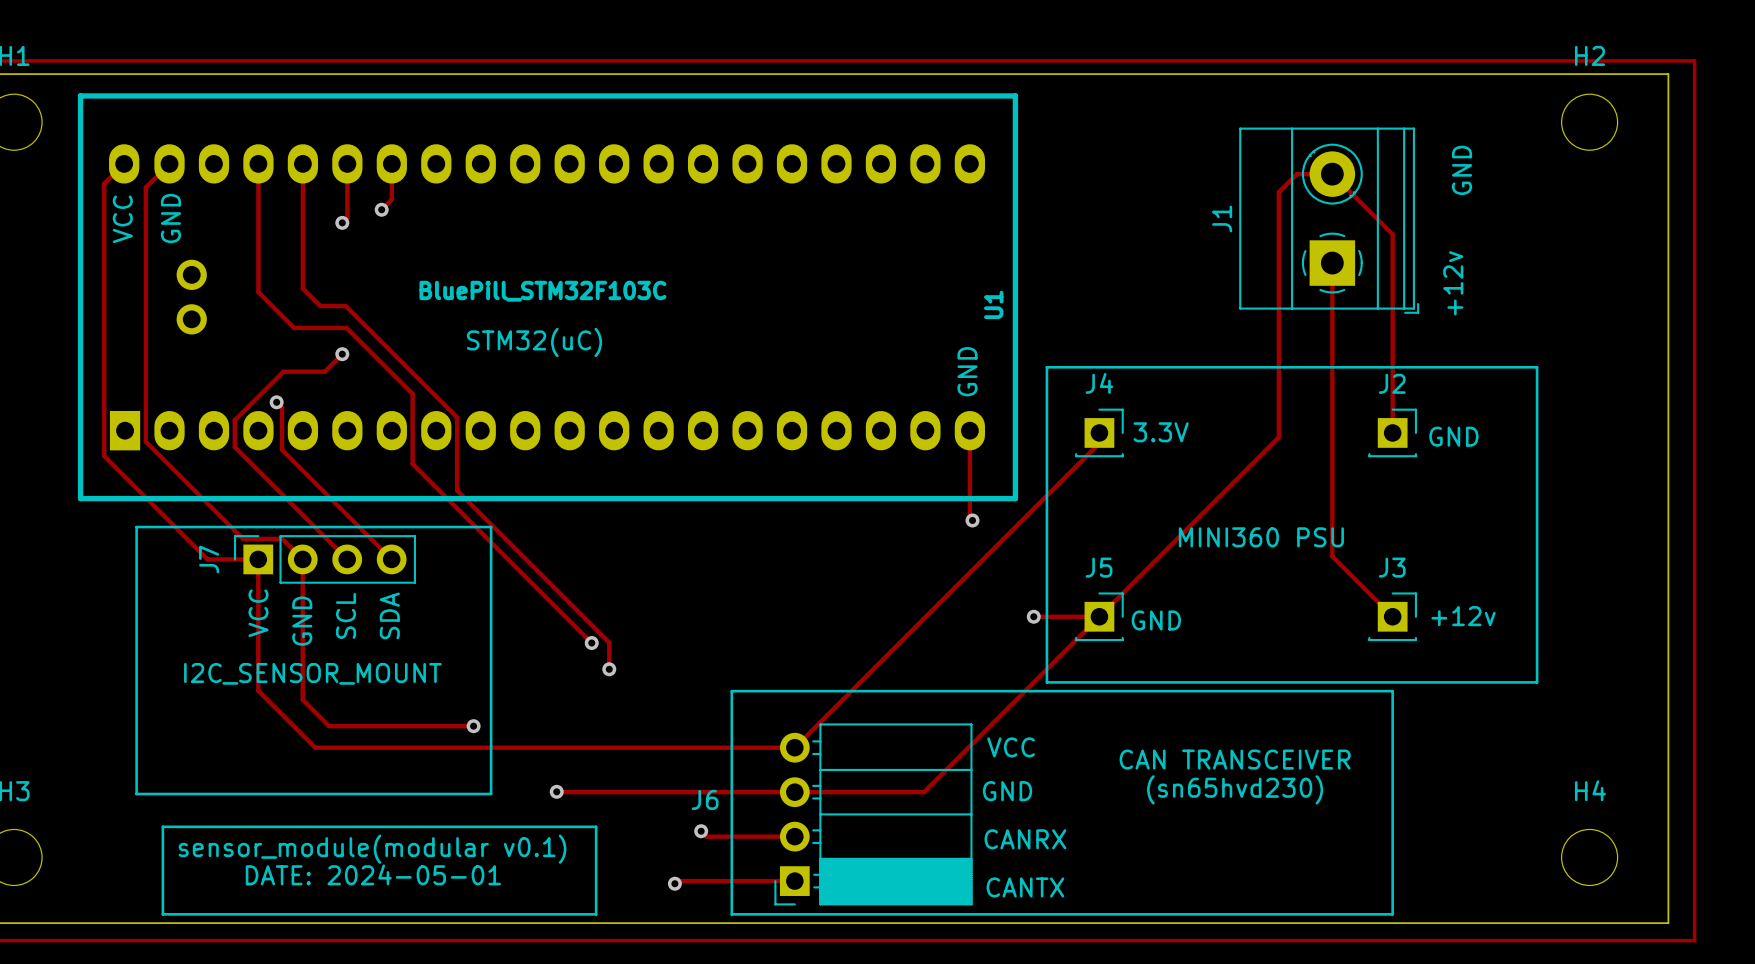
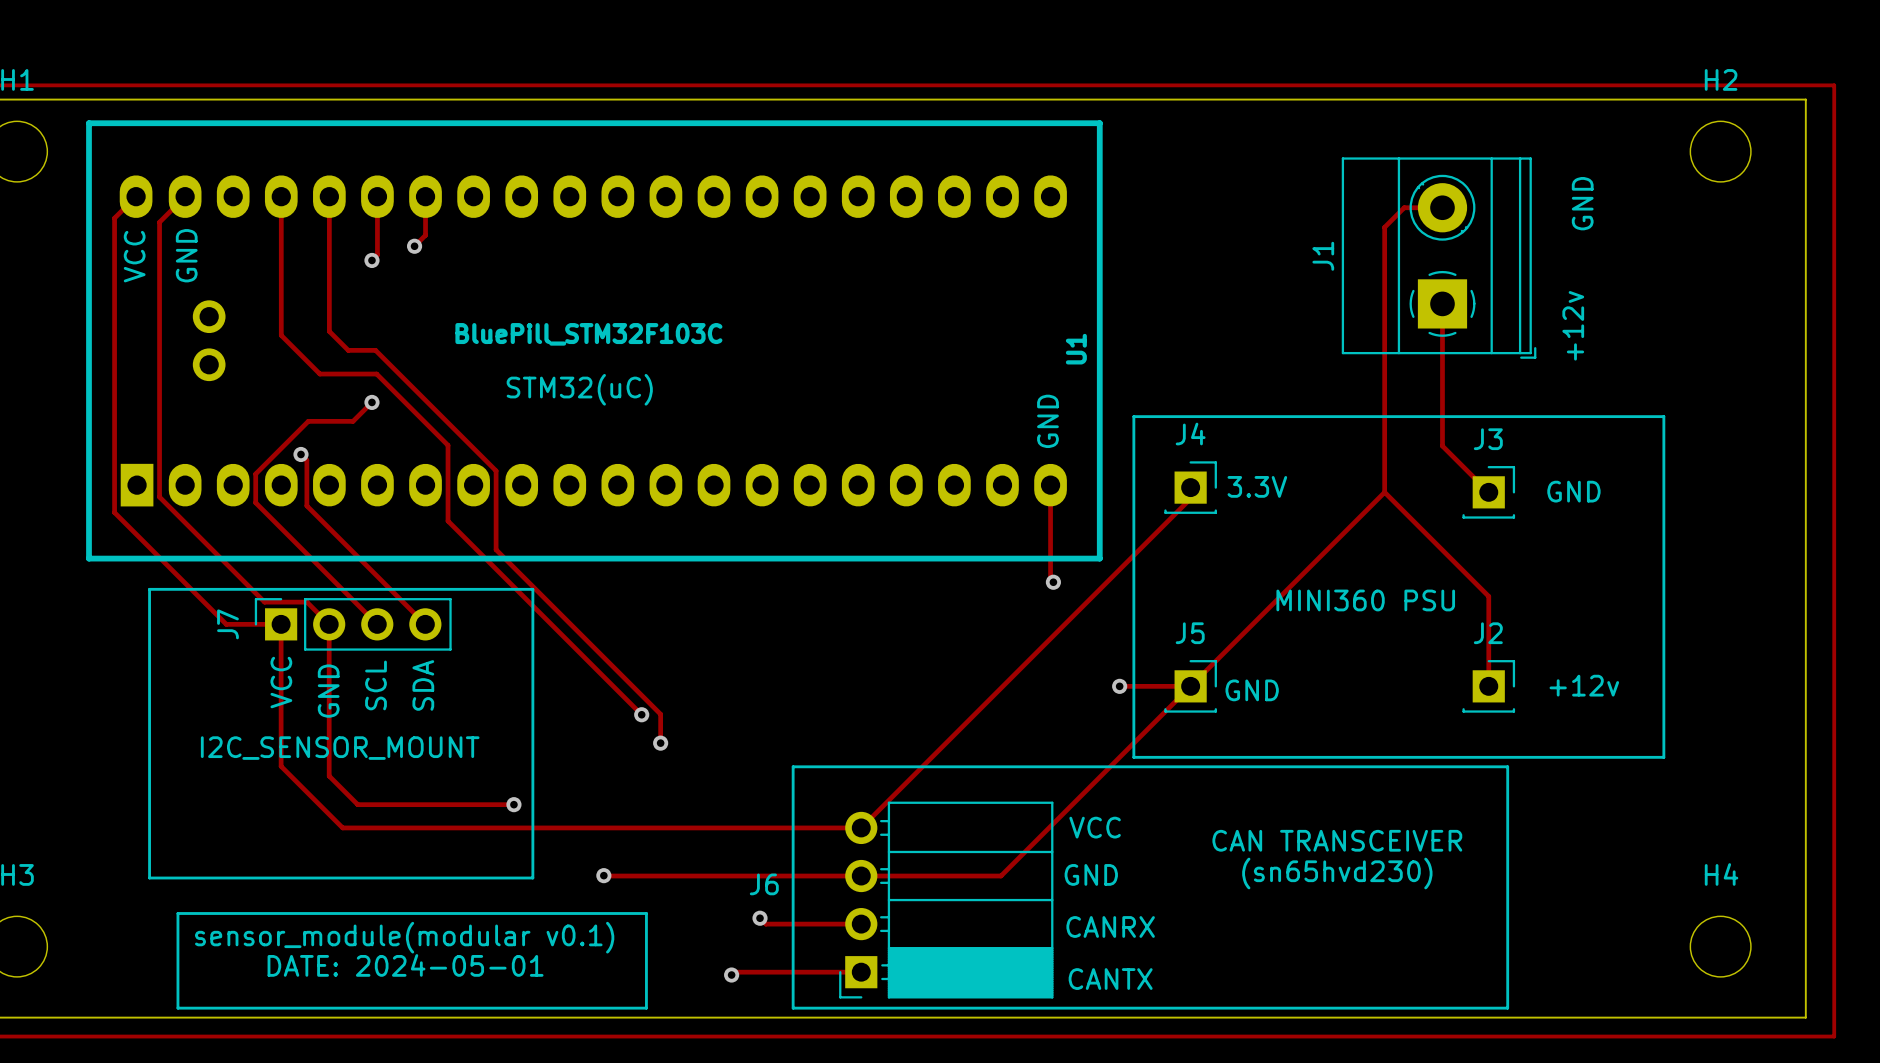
track: (1332, 174) (1392, 234) (1392, 432) -> none
track: (1332, 394) (1332, 556) (1392, 616) -> (1442, 446) (1488, 492)
J2 position: (1392, 432) -> (1488, 686)
track: none -> (1384, 492) (1488, 596) (1488, 686)
J3 position: (1392, 616) -> (1488, 492)

